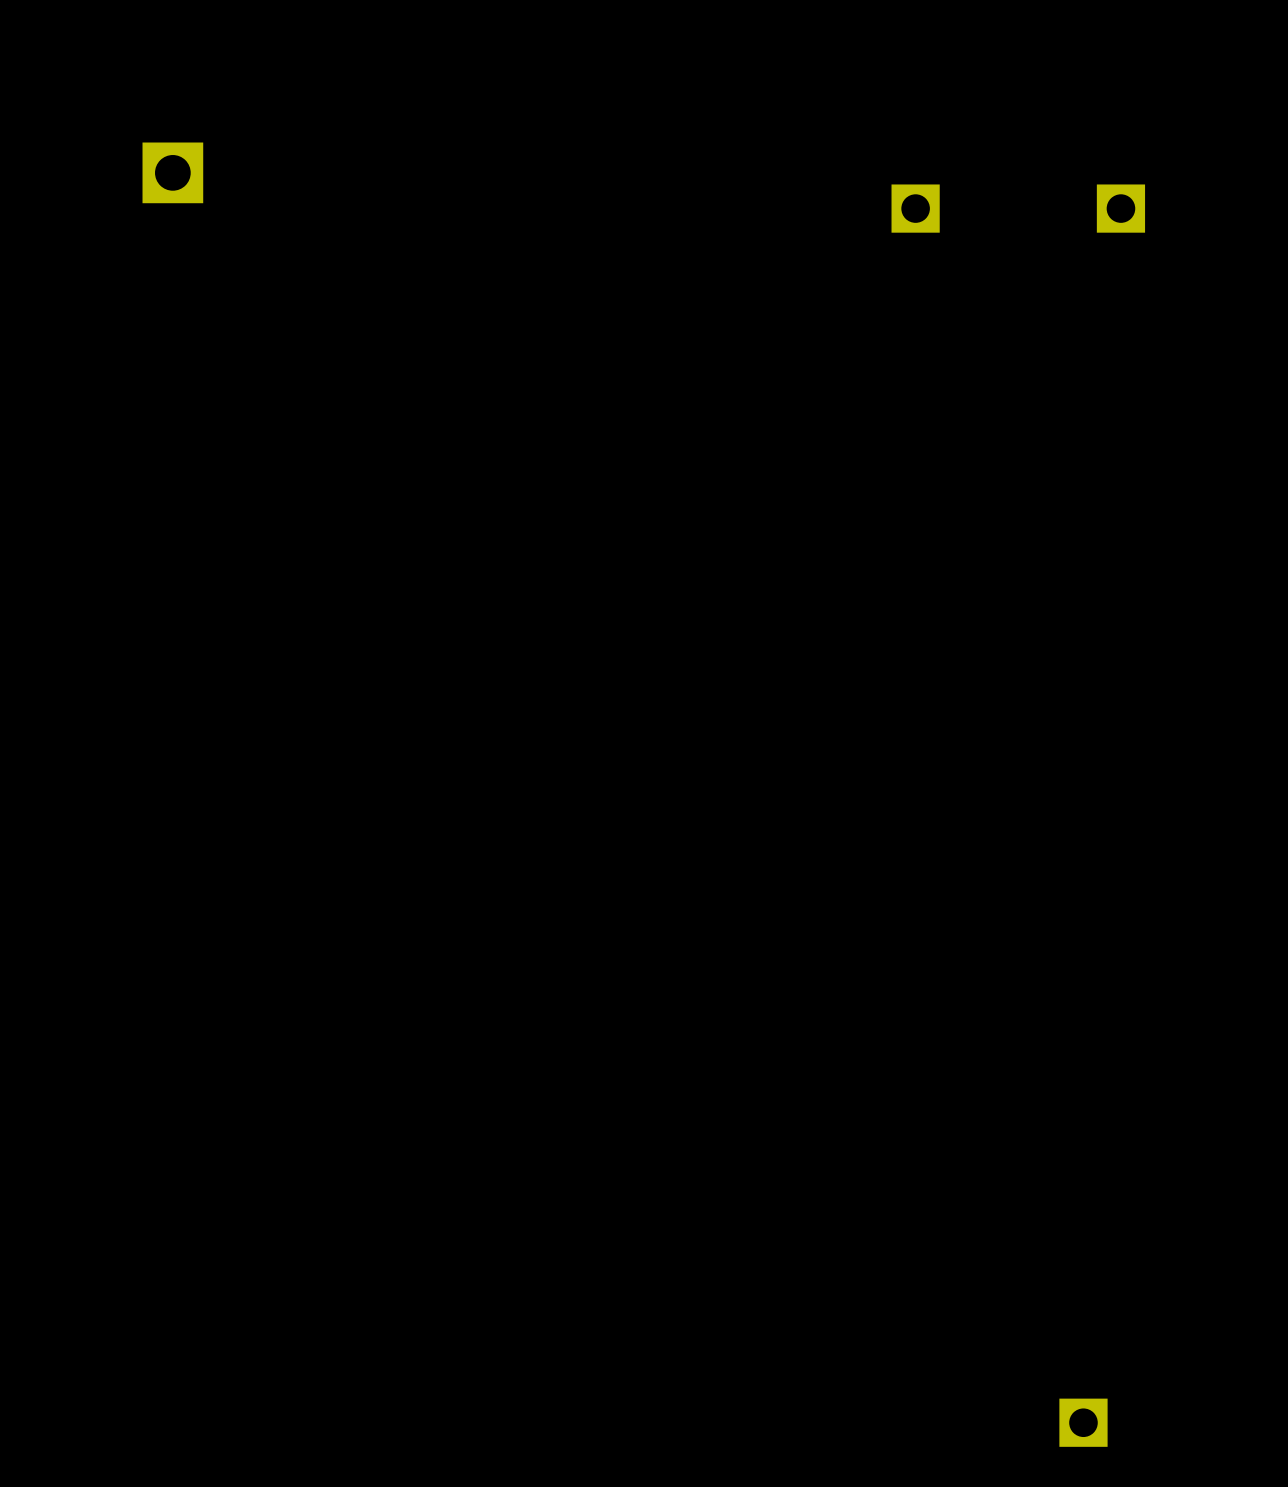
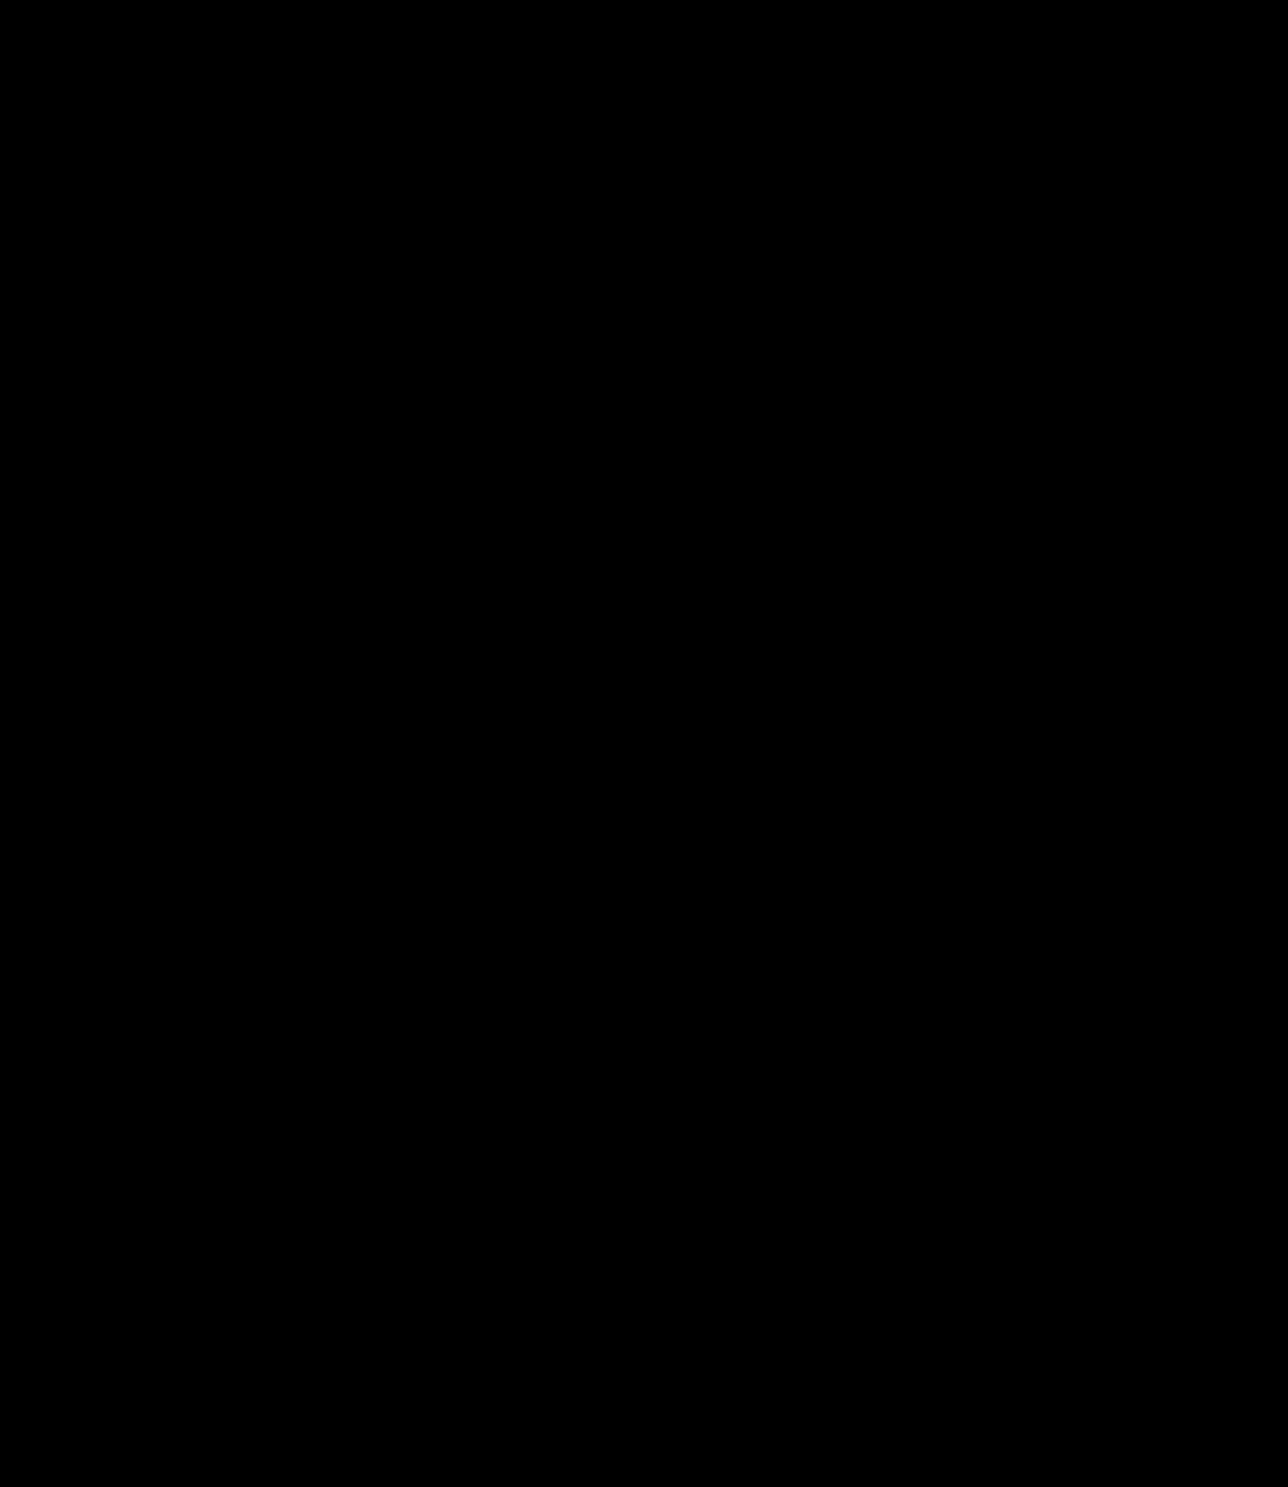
part: (172, 172) -> none
part: (915, 208) -> none
part: (1120, 208) -> none
part: (1083, 1422) -> none

